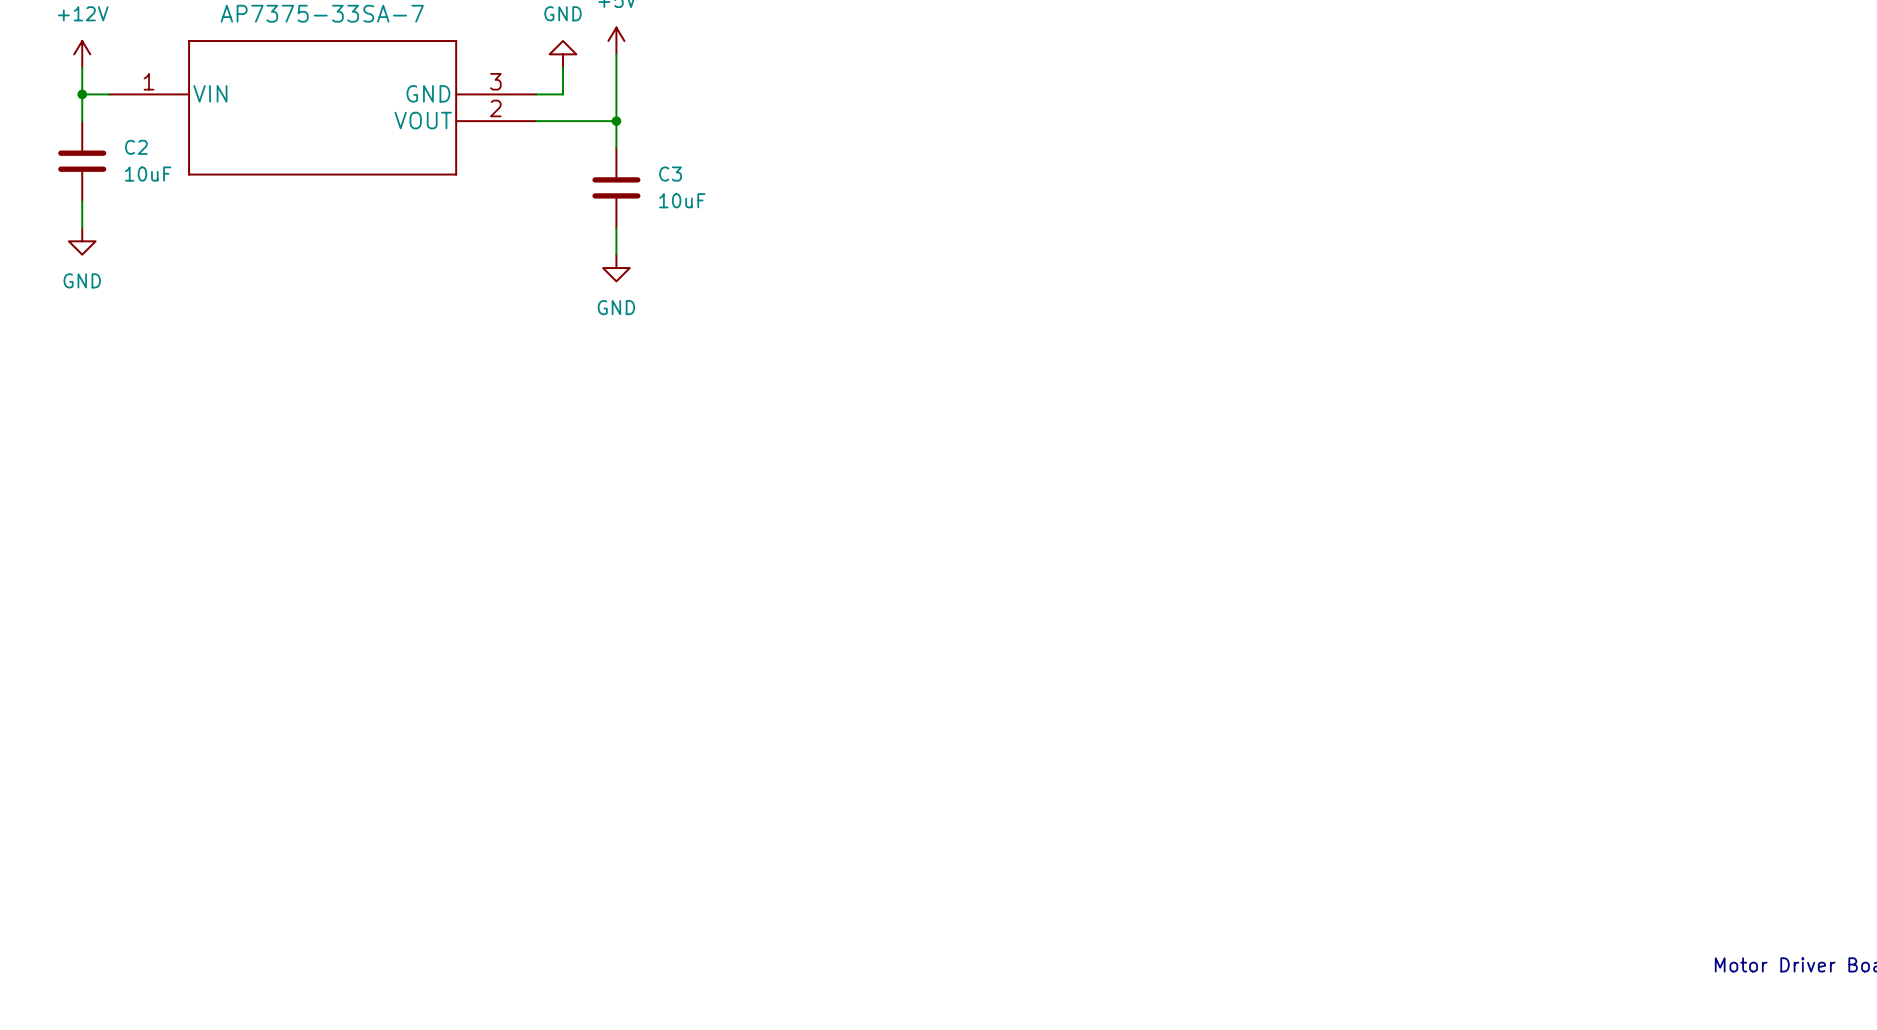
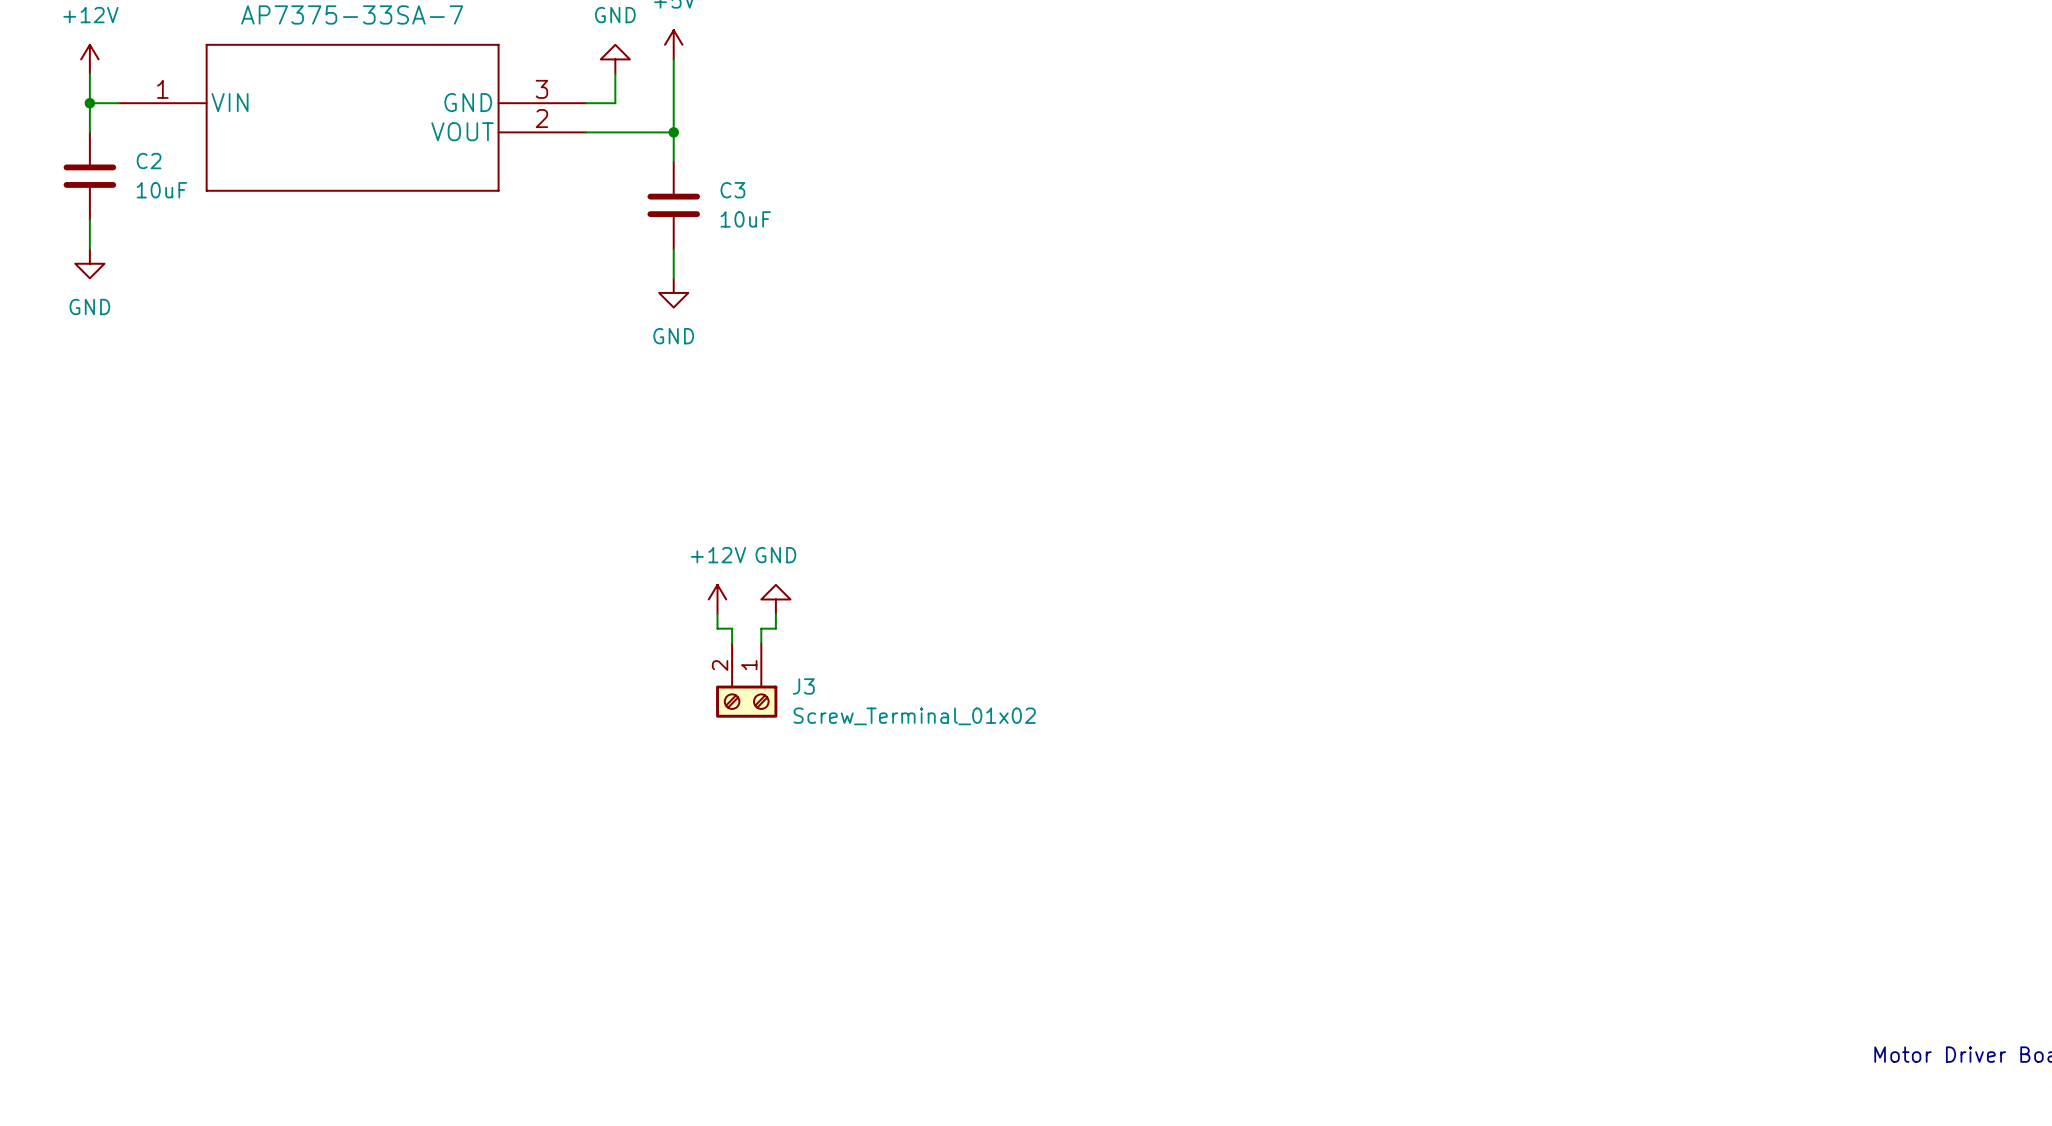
power symbol: none -> +12V (717, 599)
power symbol: none -> GND (775, 599)
wire: none -> (717, 614) (717, 628) (732, 628) (732, 643)
wire: none -> (775, 614) (775, 628) (761, 628) (761, 643)
J3: none -> Screw_Terminal_01x02 (746, 680)

